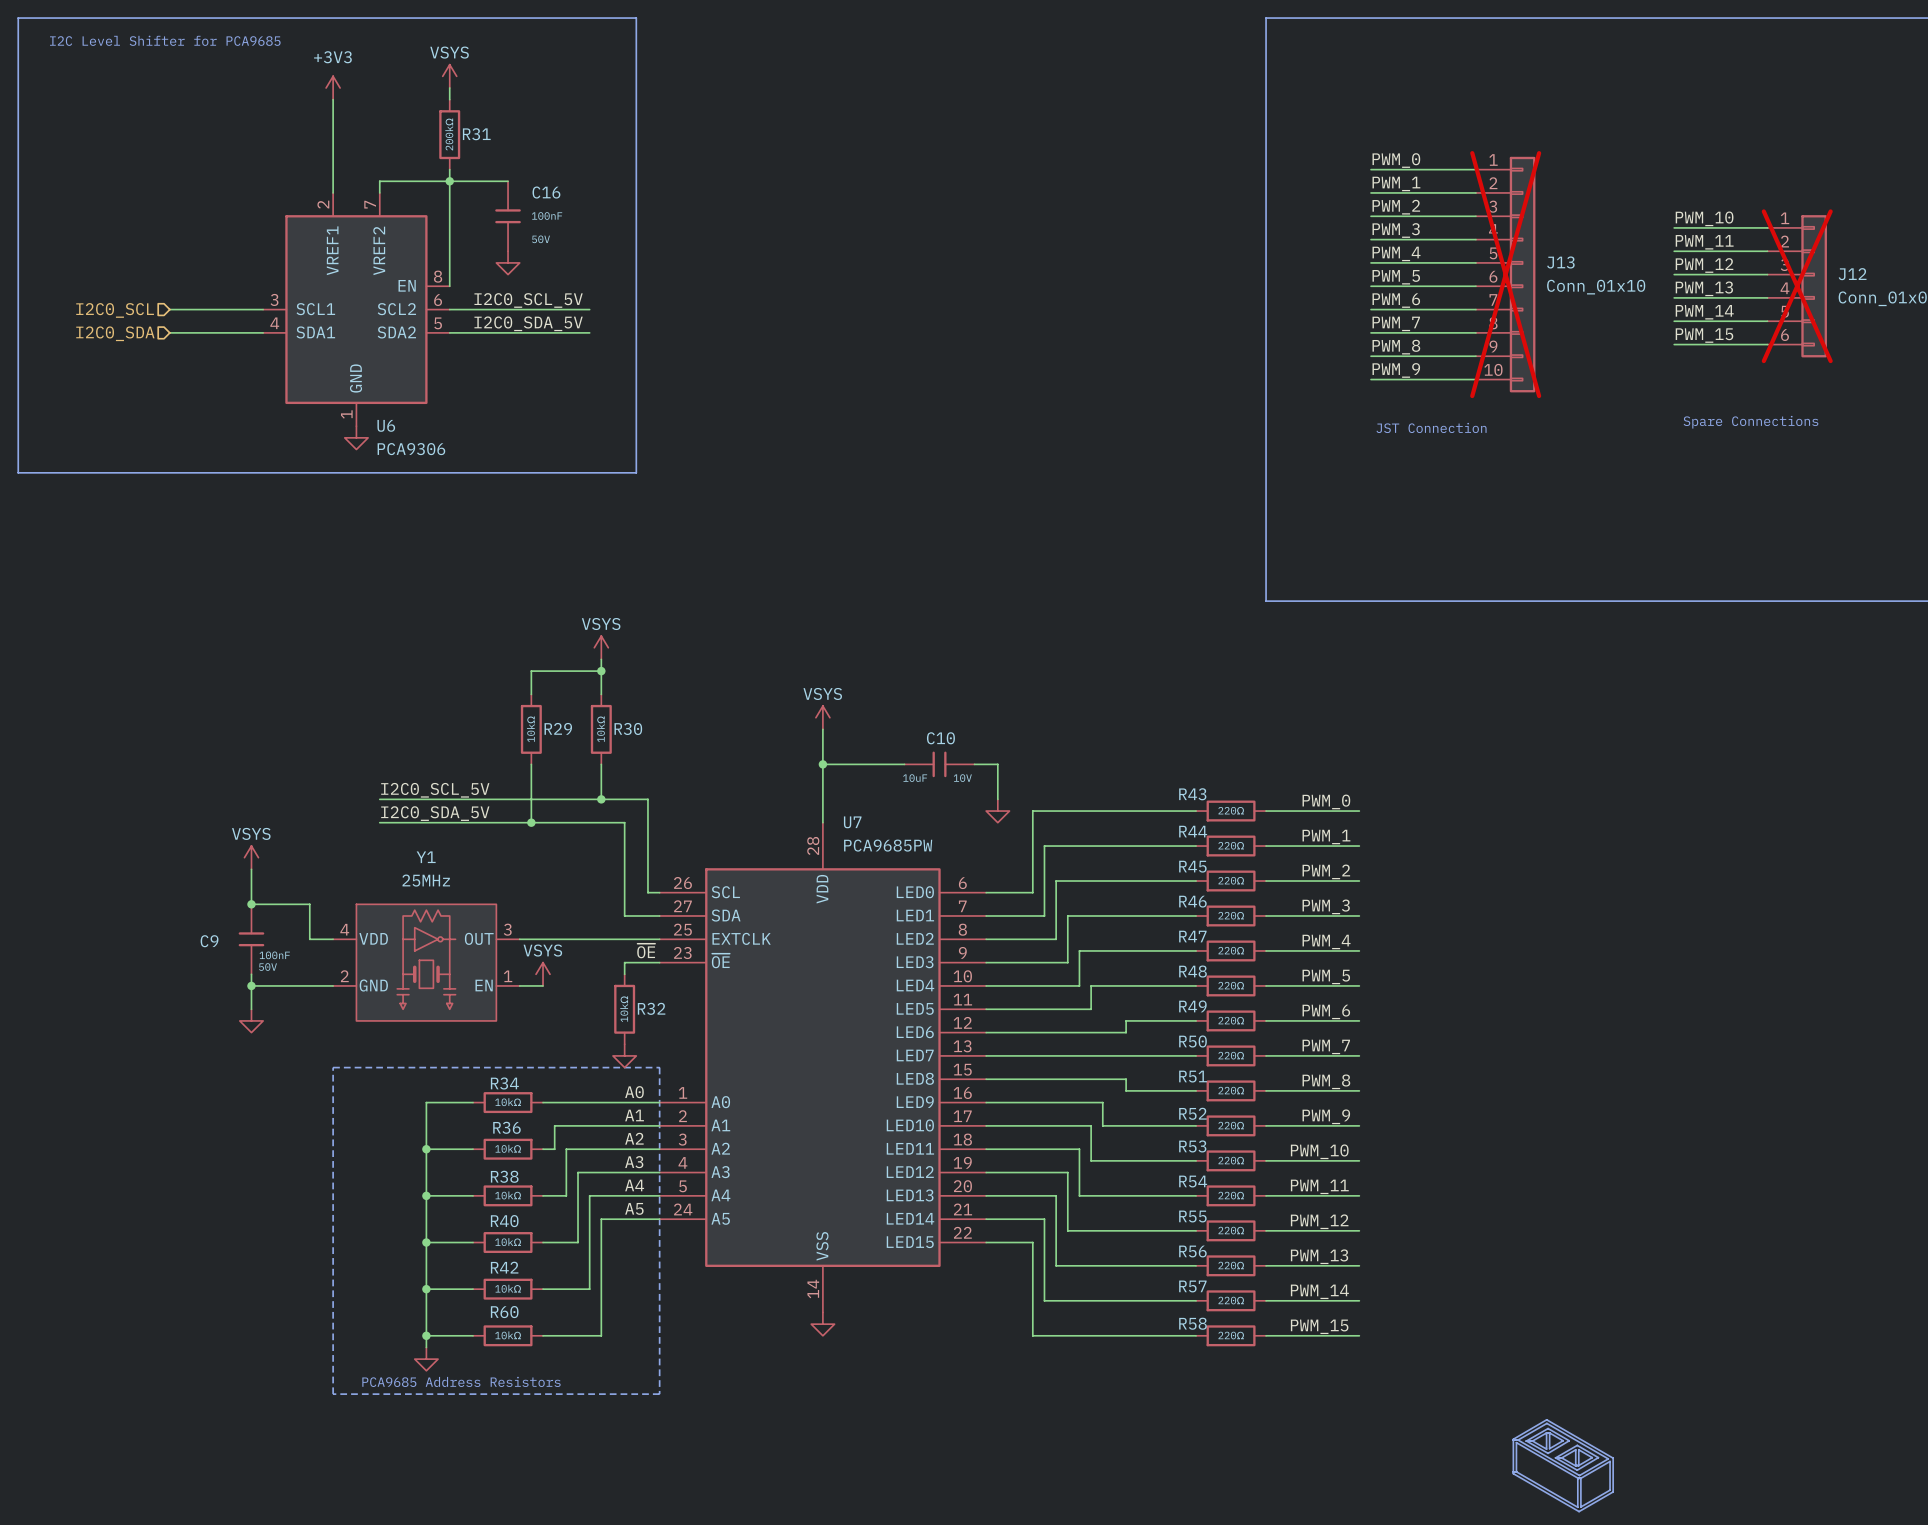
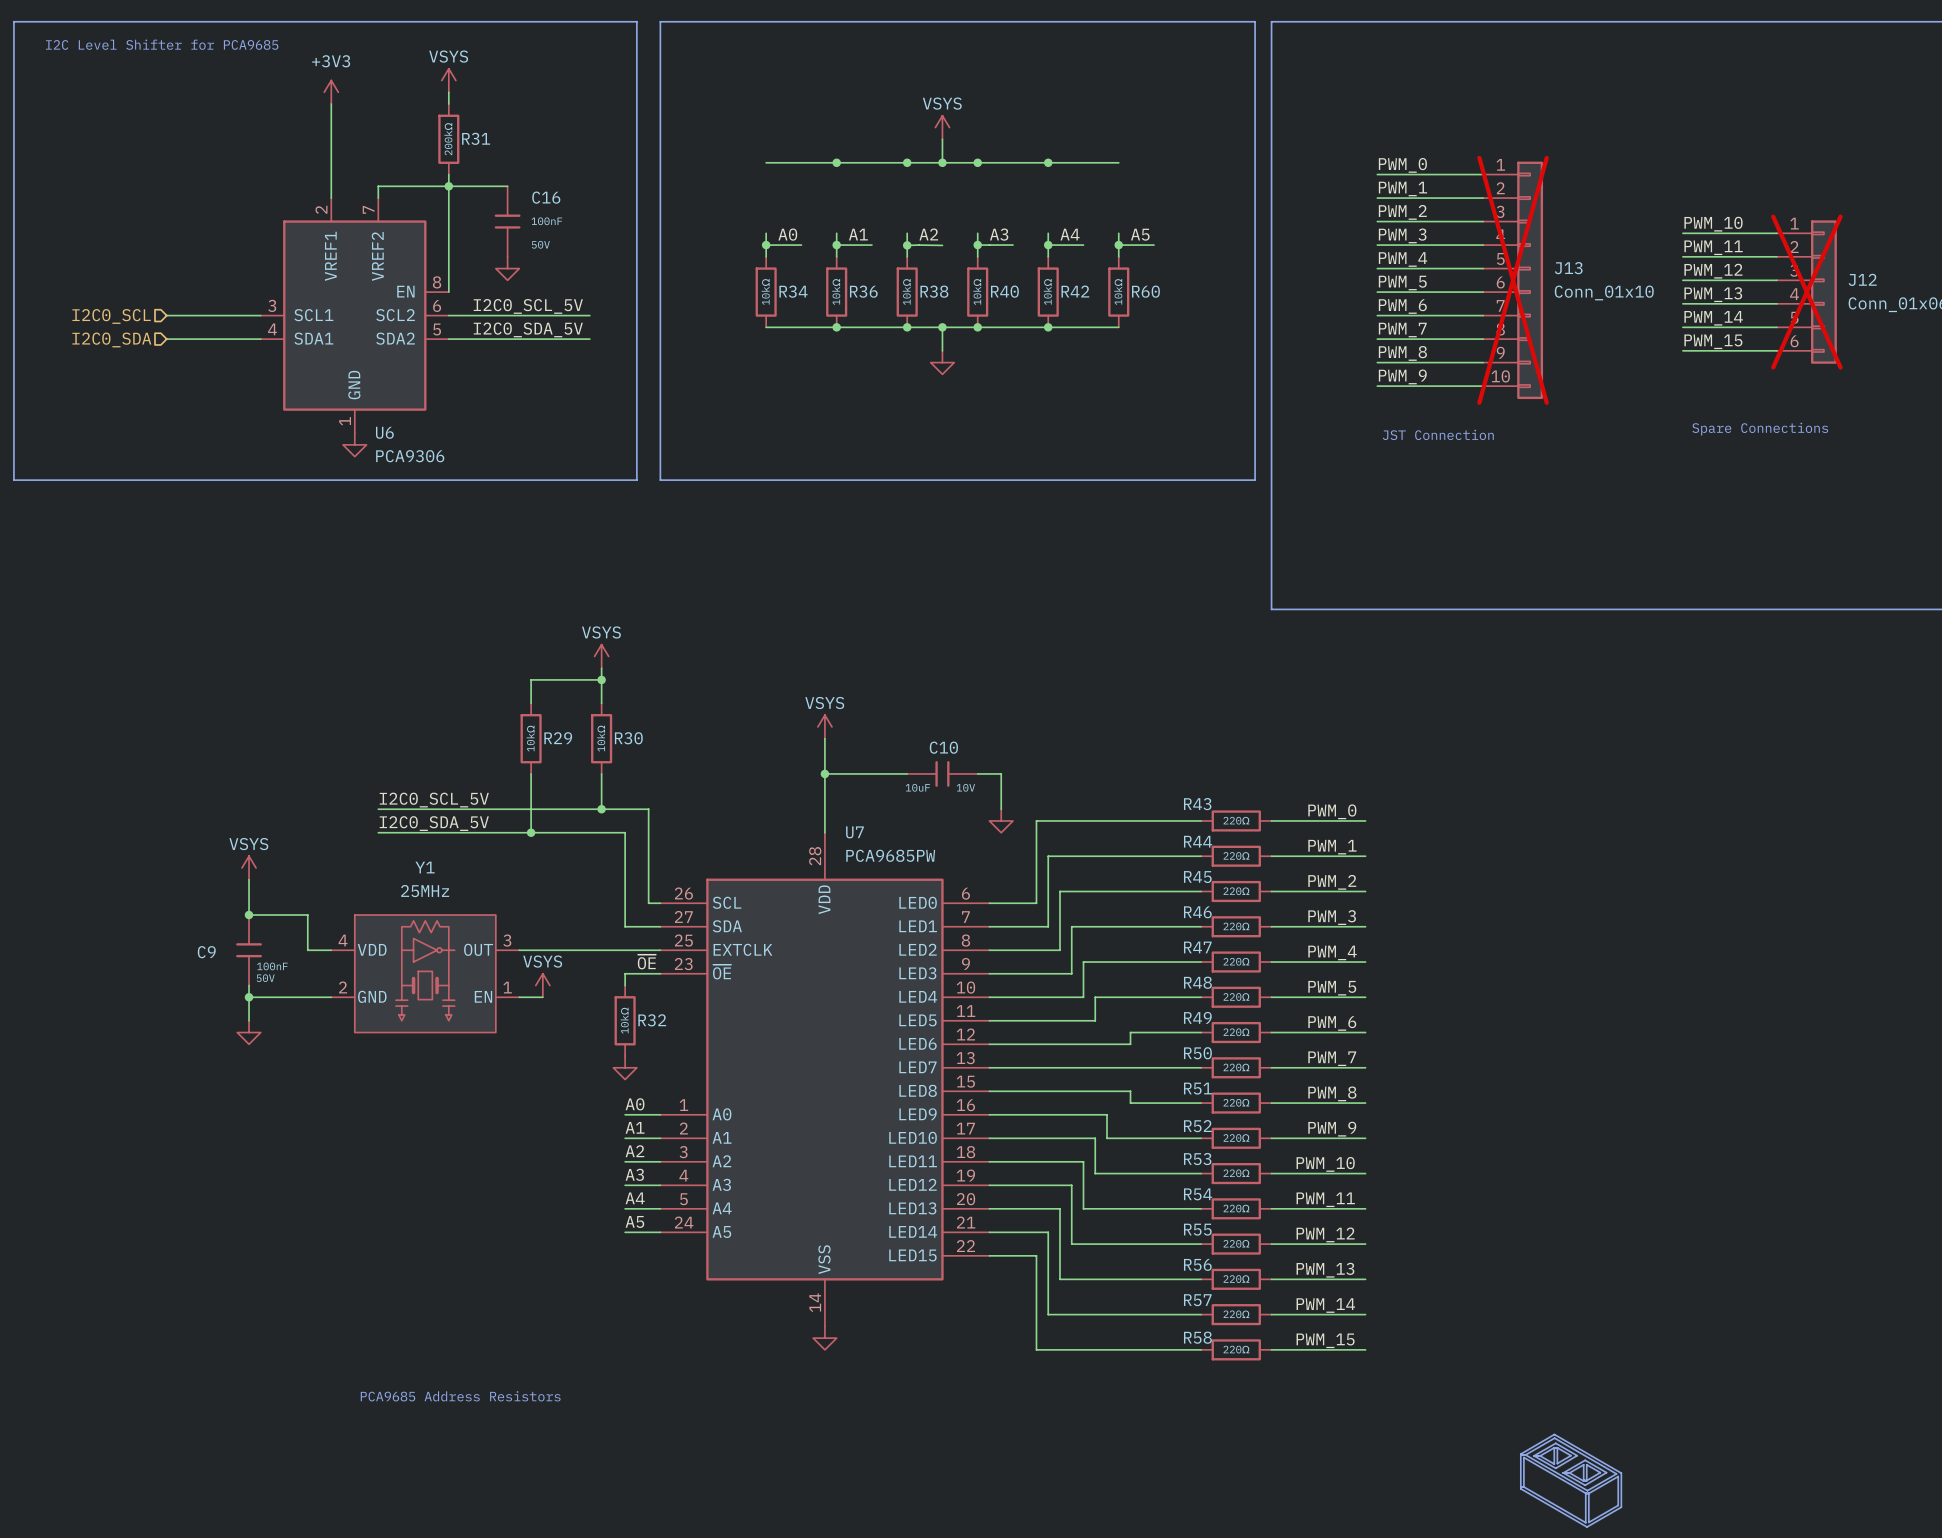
line: none -> (660, 21) (1255, 21) (1255, 480) (660, 480) (660, 21)
power symbol: none -> VSYS (942, 127)
wire: none -> (942, 139) (942, 162)
wire: none -> (766, 162) (1118, 162)
junction: none -> (836, 162)
junction: none -> (907, 162)
junction: none -> (942, 162)
junction: none -> (977, 162)
junction: none -> (1048, 162)
wire: none -> (766, 233) (766, 256)
wire: none -> (836, 233) (836, 256)
wire: none -> (907, 233) (907, 256)
wire: none -> (977, 233) (977, 256)
wire: none -> (1048, 233) (1048, 256)
wire: none -> (1118, 233) (1118, 256)
label: none -> A0 (787, 234)
label: none -> A1 (858, 234)
label: none -> A2 (928, 234)
label: none -> A3 (999, 234)
label: none -> A4 (1070, 234)
label: none -> A5 (1140, 234)
wire: none -> (766, 245) (801, 245)
junction: none -> (766, 245)
wire: none -> (836, 245) (871, 245)
junction: none -> (836, 245)
wire: none -> (907, 245) (942, 245)
junction: none -> (907, 245)
wire: none -> (977, 245) (1012, 245)
junction: none -> (977, 245)
wire: none -> (1048, 245) (1083, 245)
junction: none -> (1048, 245)
wire: none -> (1118, 245) (1154, 245)
junction: none -> (1118, 245)
wire: none -> (766, 327) (1118, 327)
junction: none -> (836, 327)
junction: none -> (907, 327)
wire: none -> (942, 327) (942, 350)
junction: none -> (942, 327)
junction: none -> (977, 327)
junction: none -> (1048, 327)
power symbol: none -> (942, 362)
line: (333, 1067) (659, 1067) (659, 1394) (333, 1394) (333, 1067) -> none
wire: (473, 1102) (426, 1102) (426, 1347) -> none
R34 rotation: 0° (508, 1102) -> 90° clockwise (766, 292)
R34 position: (508, 1102) -> (766, 292)
wire: (543, 1102) (624, 1102) -> none
wire: (624, 1125) (554, 1125) (554, 1149) (543, 1149) -> none
wire: (426, 1149) (473, 1149) -> none
junction: (426, 1149) -> none
R36 rotation: 0° (508, 1149) -> 90° clockwise (836, 292)
R36 position: (508, 1149) -> (836, 292)
wire: (624, 1149) (566, 1149) (566, 1195) (543, 1195) -> none
wire: (624, 1172) (578, 1172) (578, 1242) (543, 1242) -> none
wire: (426, 1195) (473, 1195) -> none
junction: (426, 1195) -> none
R38 rotation: 0° (508, 1195) -> 90° clockwise (907, 292)
R38 position: (508, 1195) -> (907, 292)
wire: (624, 1195) (589, 1195) (589, 1289) (543, 1289) -> none
wire: (624, 1219) (601, 1219) (601, 1335) (543, 1335) -> none
wire: (426, 1242) (473, 1242) -> none
junction: (426, 1242) -> none
R40 rotation: 0° (508, 1242) -> 90° clockwise (977, 292)
R40 position: (508, 1242) -> (977, 292)
wire: (426, 1289) (473, 1289) -> none
junction: (426, 1289) -> none
R42 rotation: 0° (508, 1289) -> 90° clockwise (1048, 292)
R42 position: (508, 1289) -> (1048, 292)
wire: (426, 1335) (473, 1335) -> none
junction: (426, 1335) -> none
R60 rotation: 0° (508, 1335) -> 90° clockwise (1118, 292)
R60 position: (508, 1335) -> (1118, 292)
power symbol: (426, 1359) -> none

